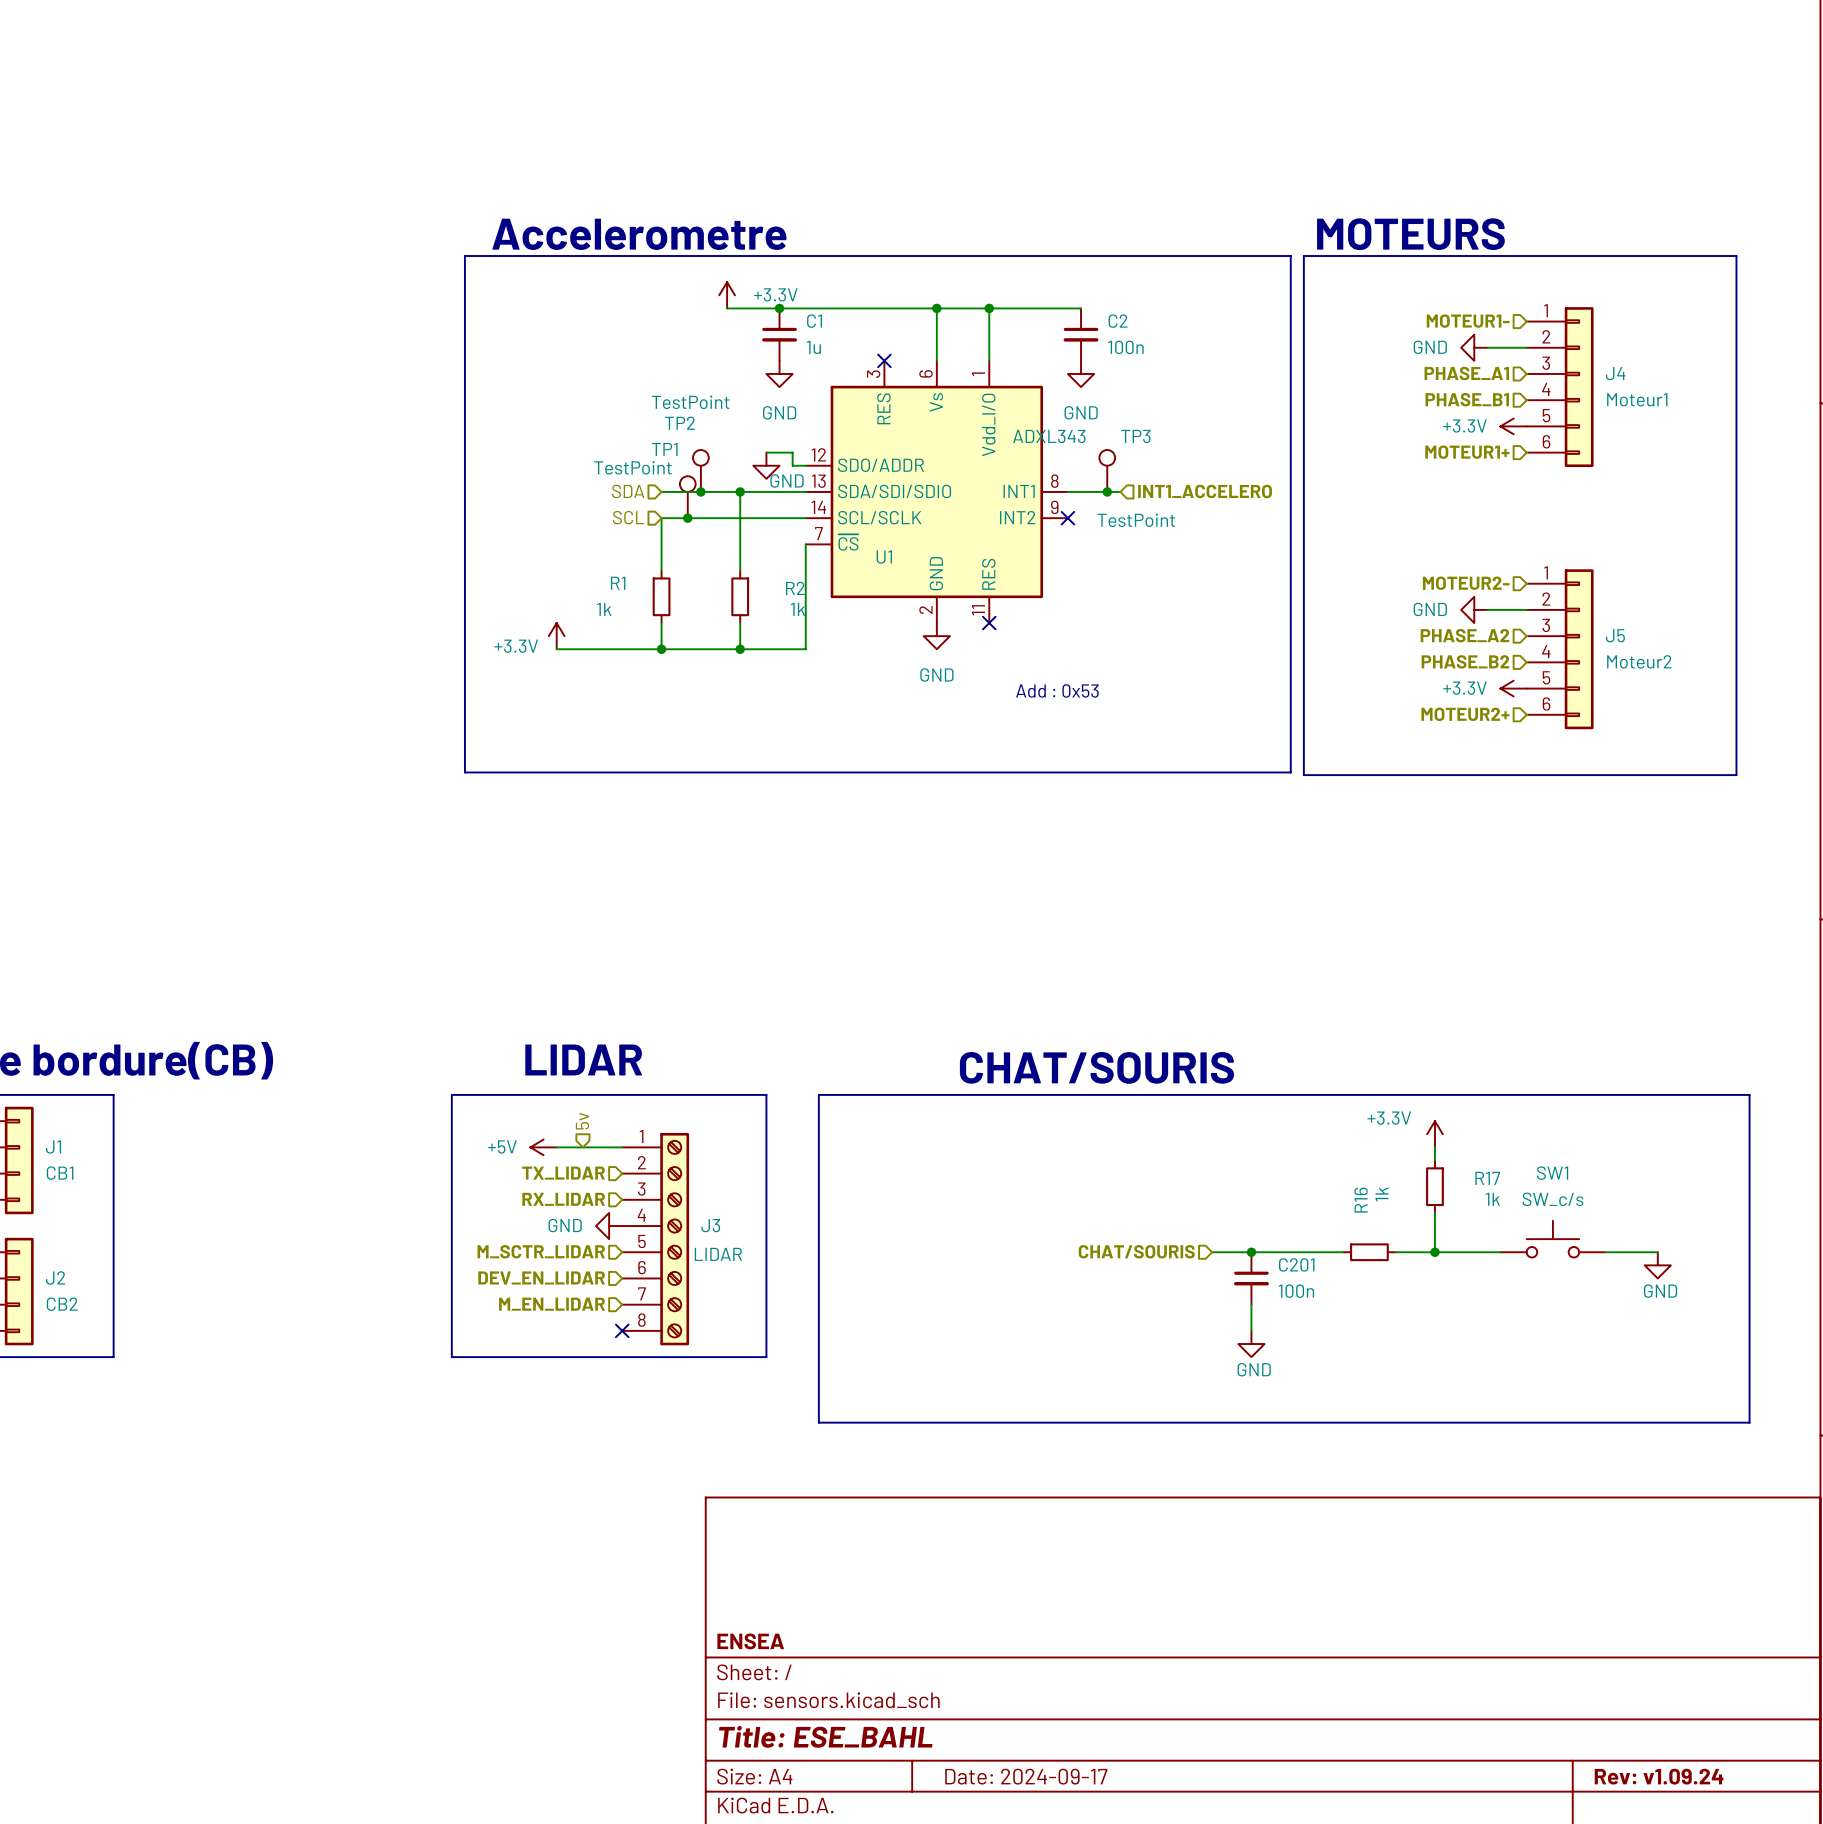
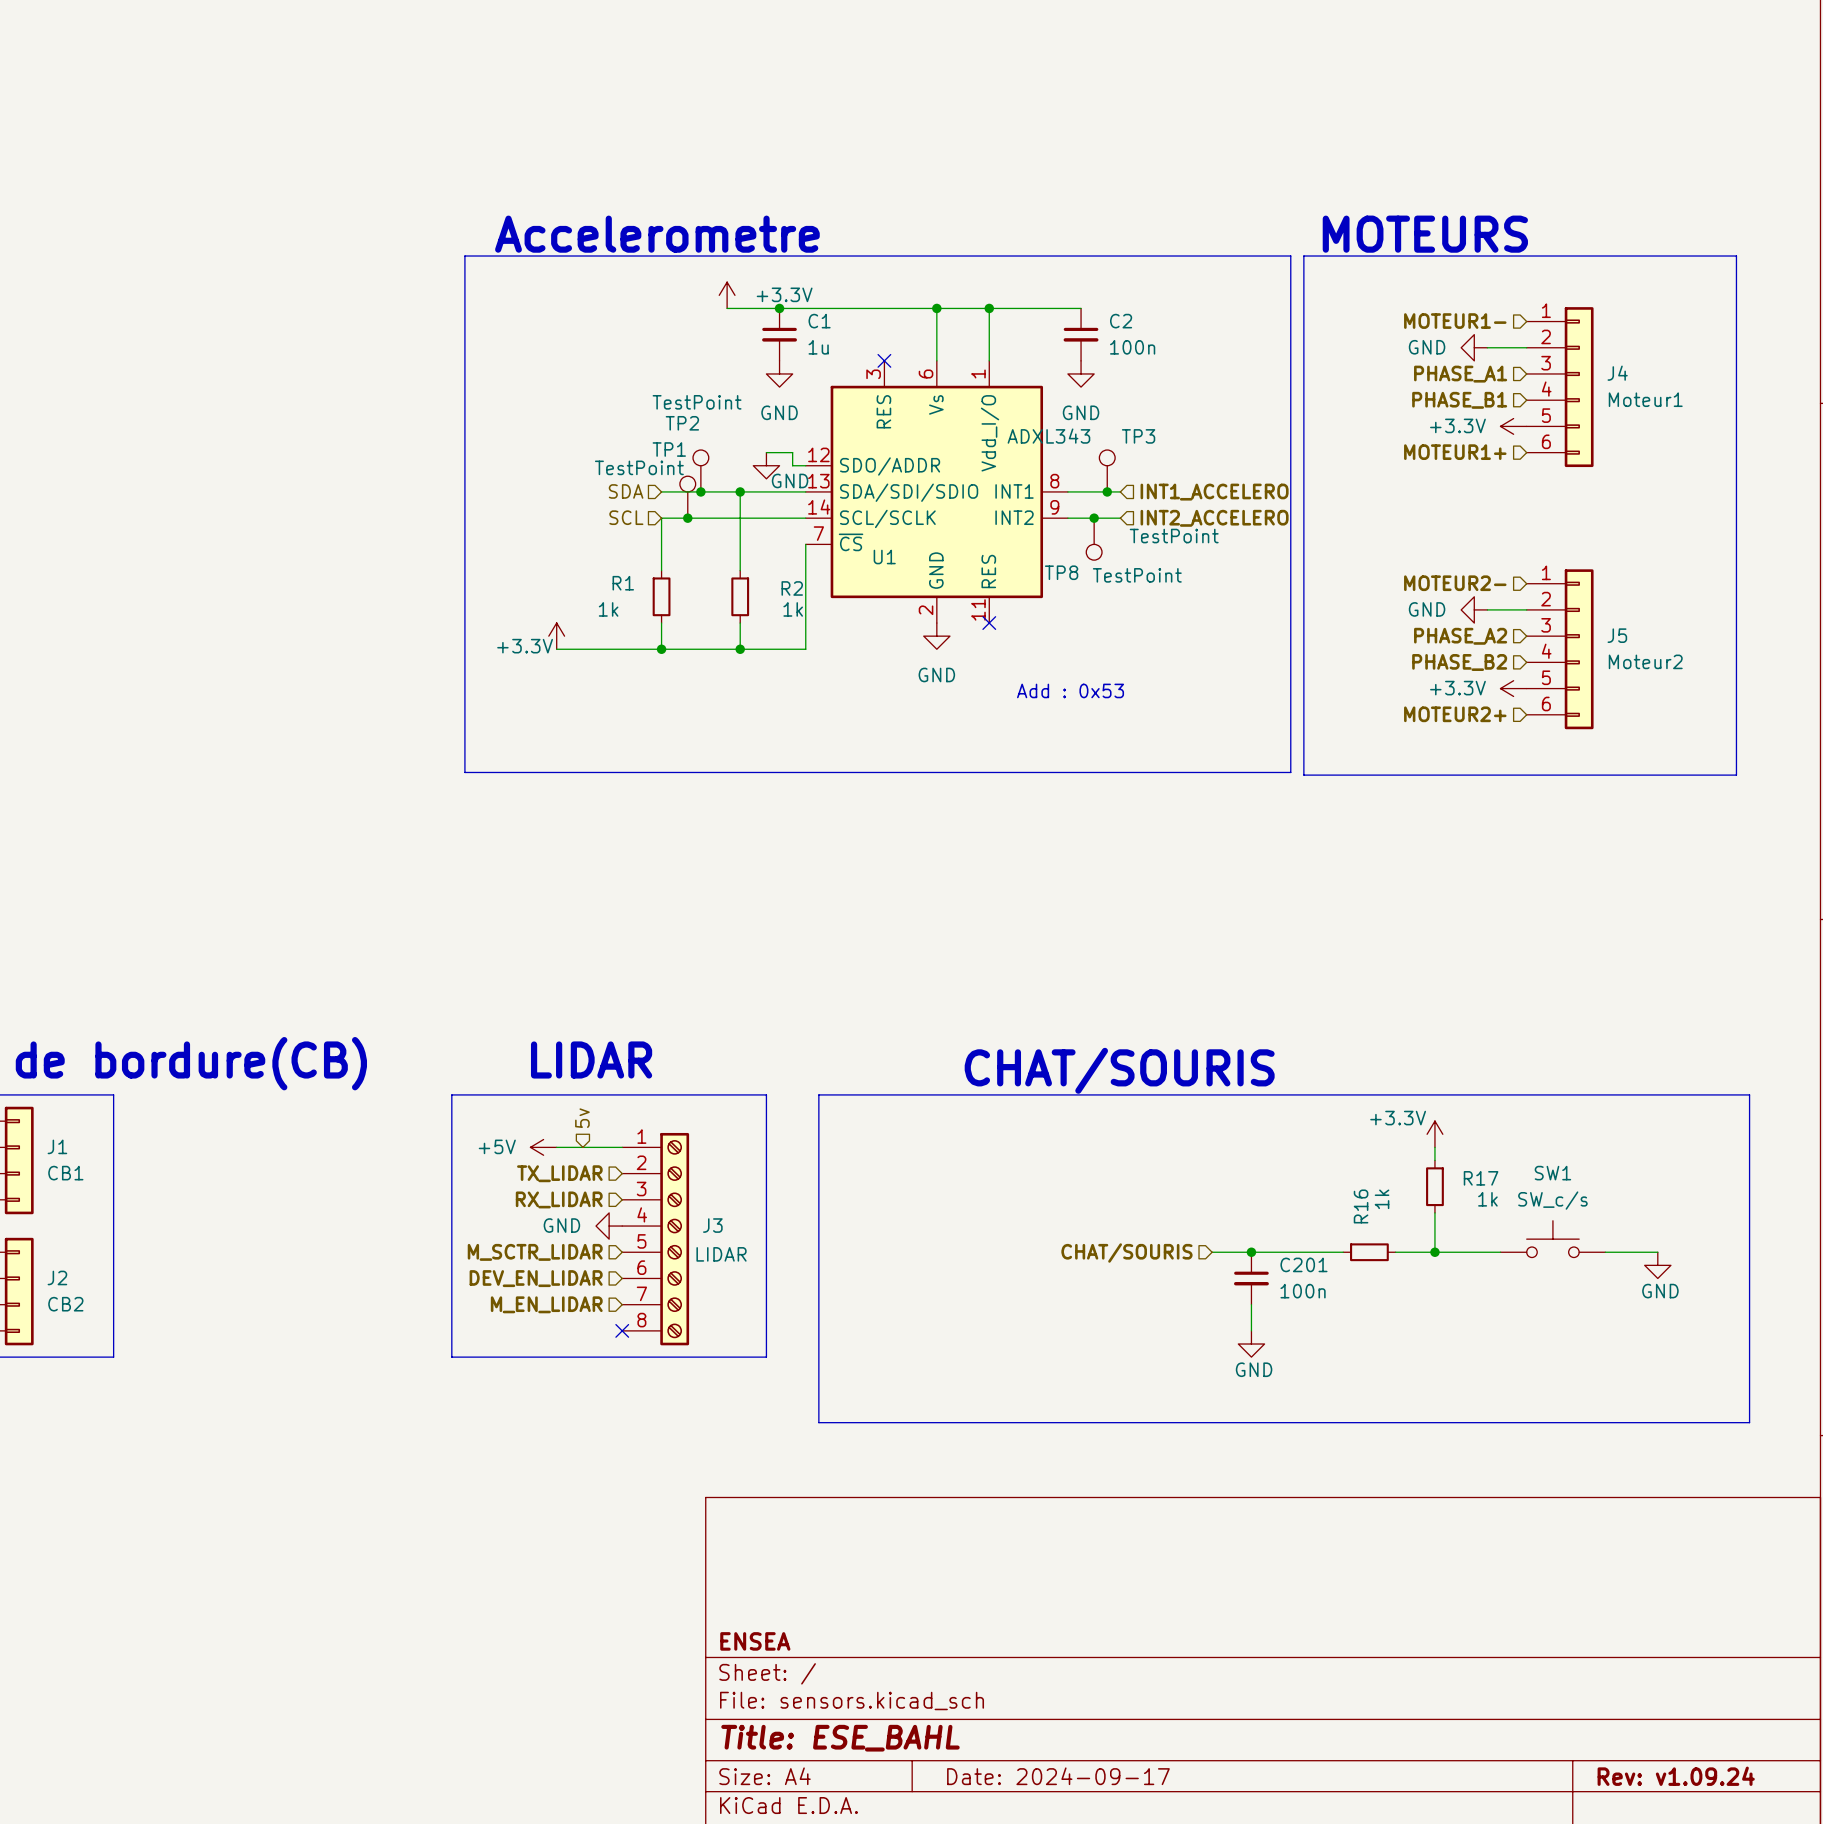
hierarchical label: none -> INT2_ACCELERO (1214, 518)
wire: none -> (1067, 518) (1120, 518)
no-connect mark: (1067, 518) -> none
junction: none -> (1094, 518)
TP3 value position: TestPoint (1136, 520) -> TestPoint (1174, 536)
TP8: none -> TestPoint (1094, 539)

